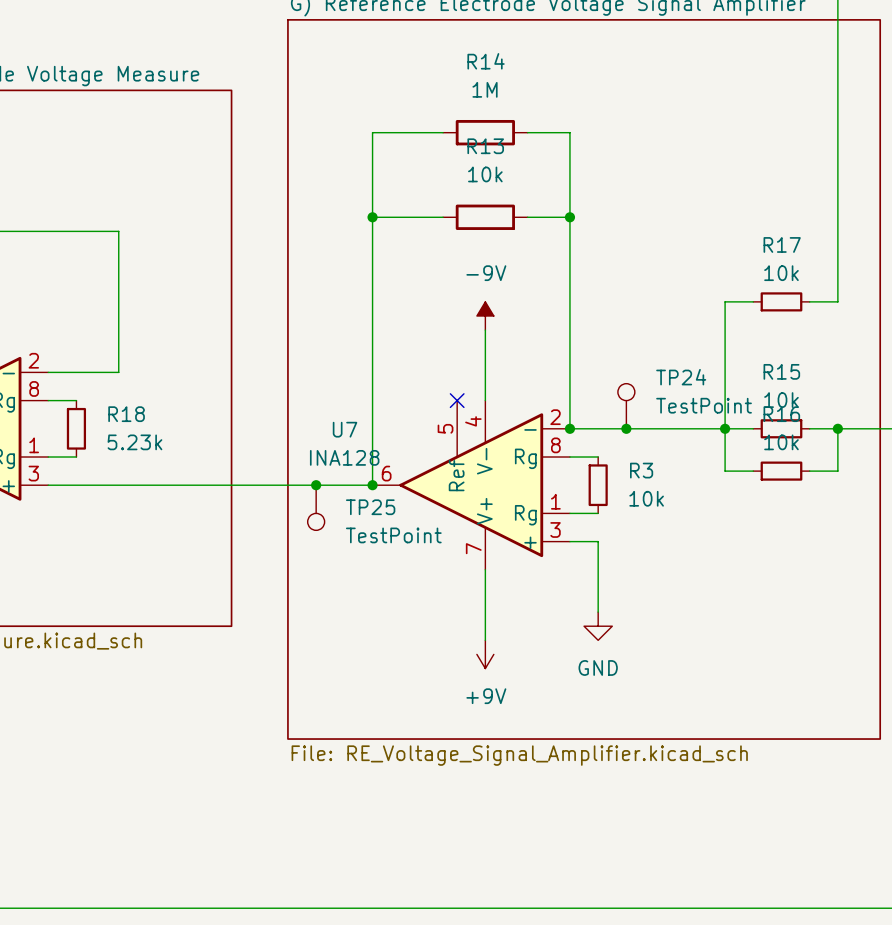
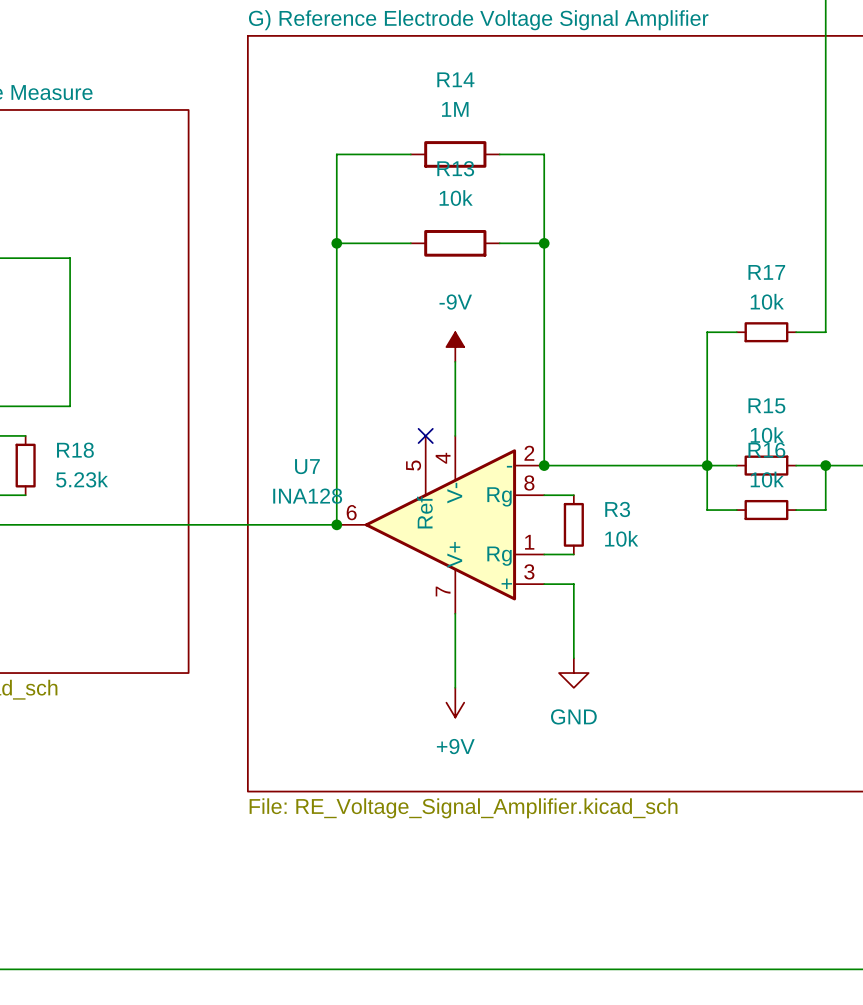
TP24: TestPoint (626, 406) -> none
junction: (626, 428) -> none
junction: (316, 485) -> none
TP25: TestPoint (316, 507) -> none

